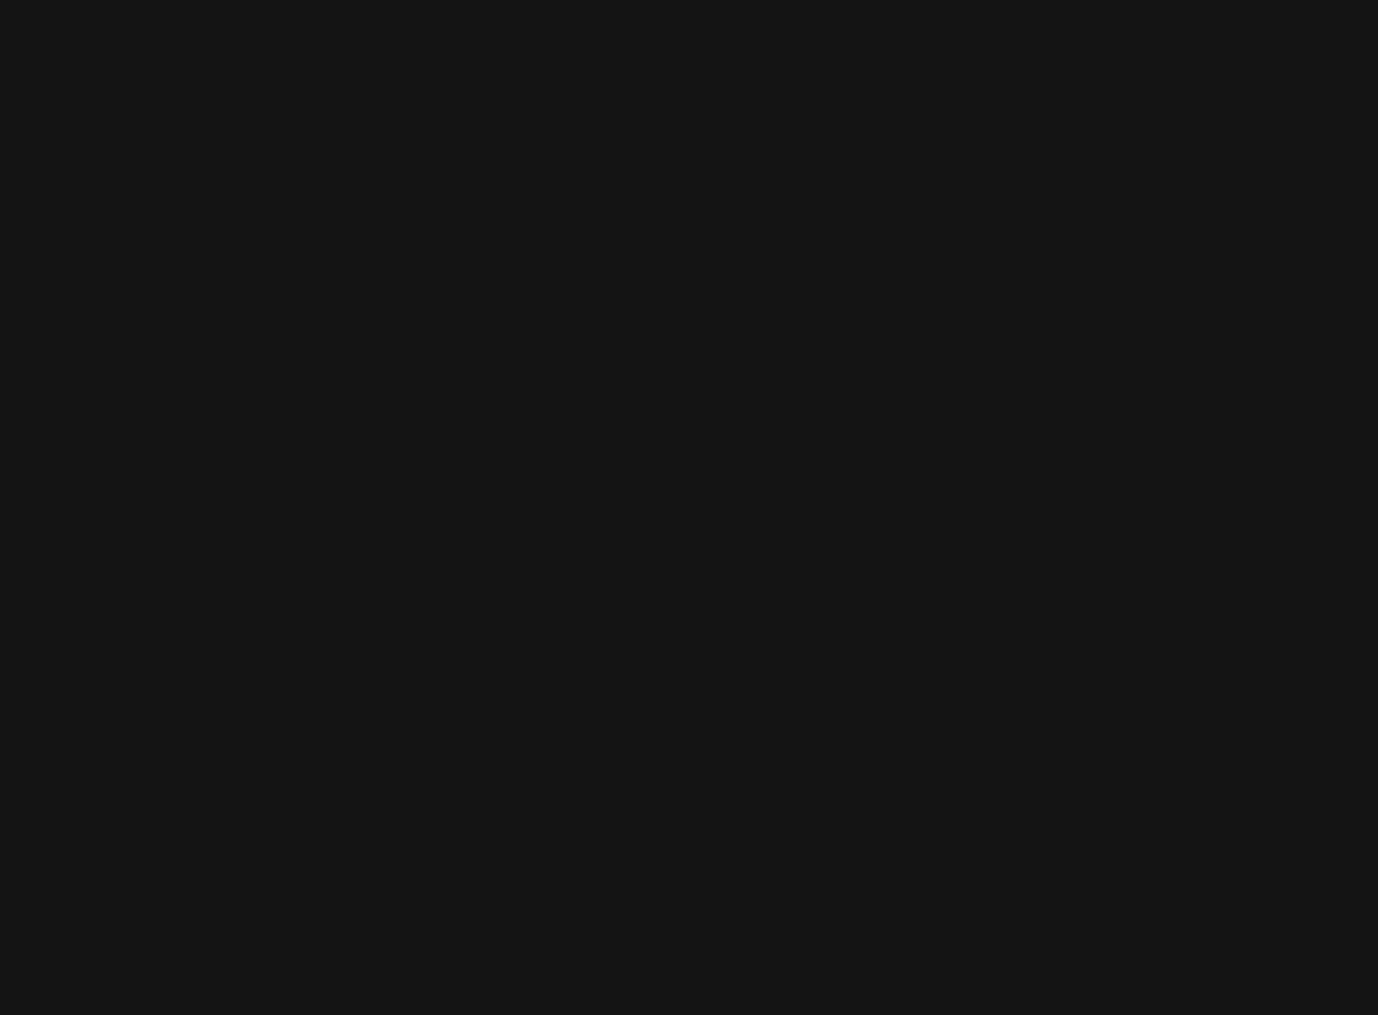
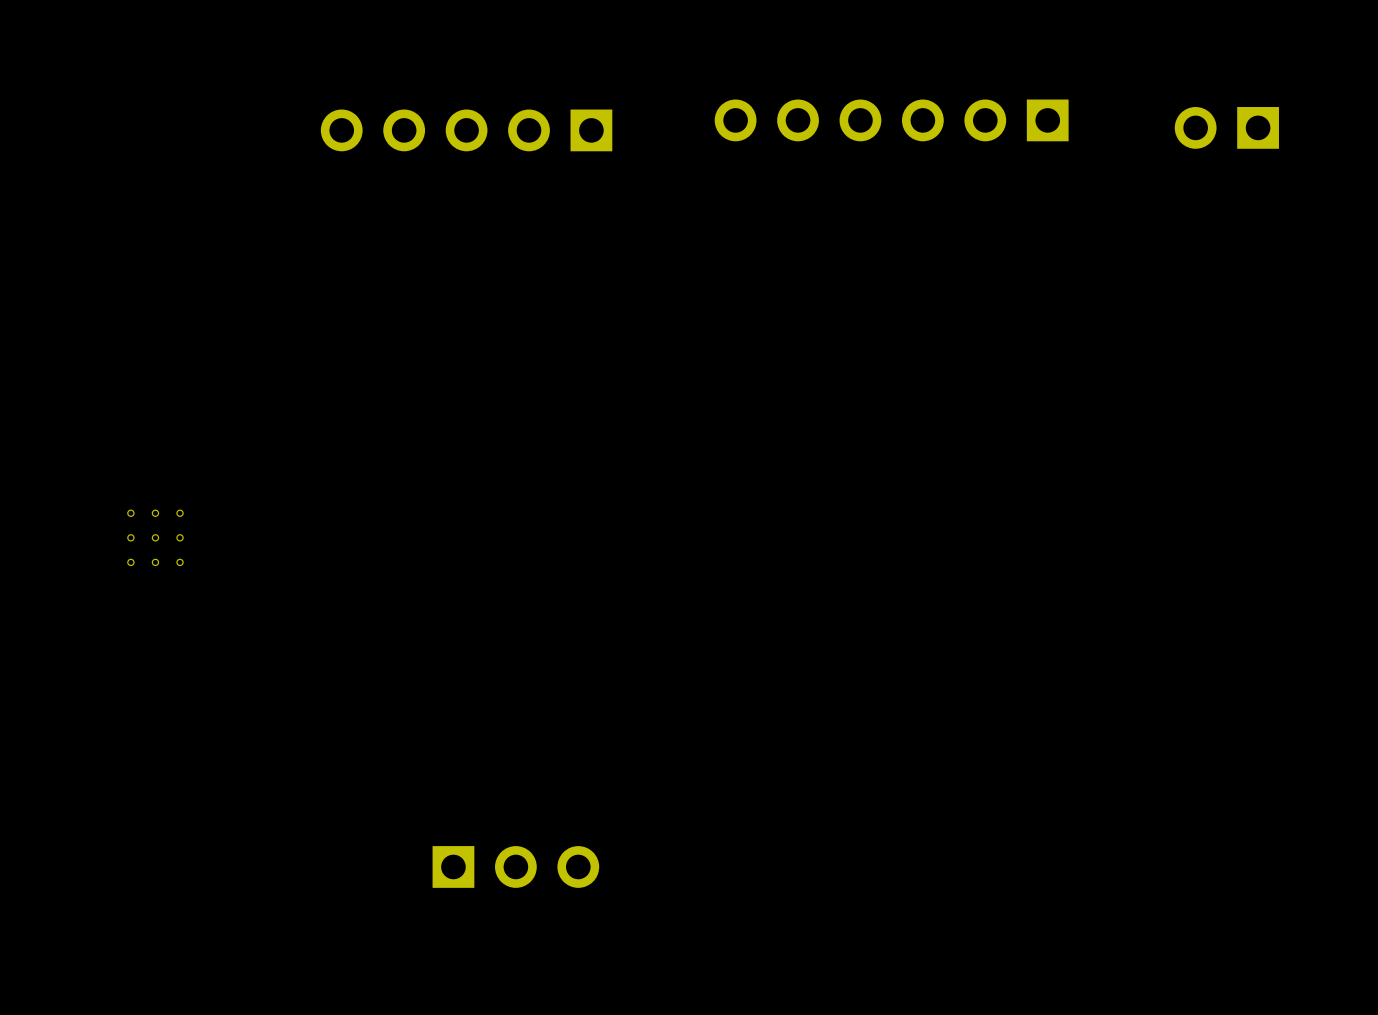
part: none -> (891, 120)
part: none -> (1226, 127)
part: none -> (466, 130)
part: none -> (155, 537)
part: none -> (515, 866)

